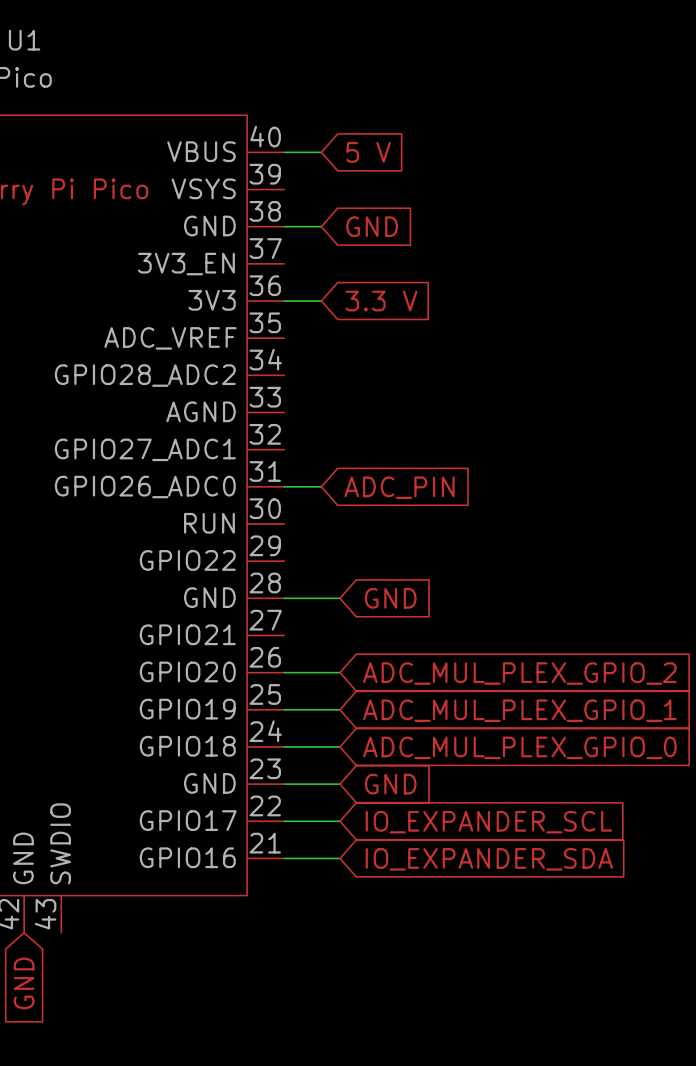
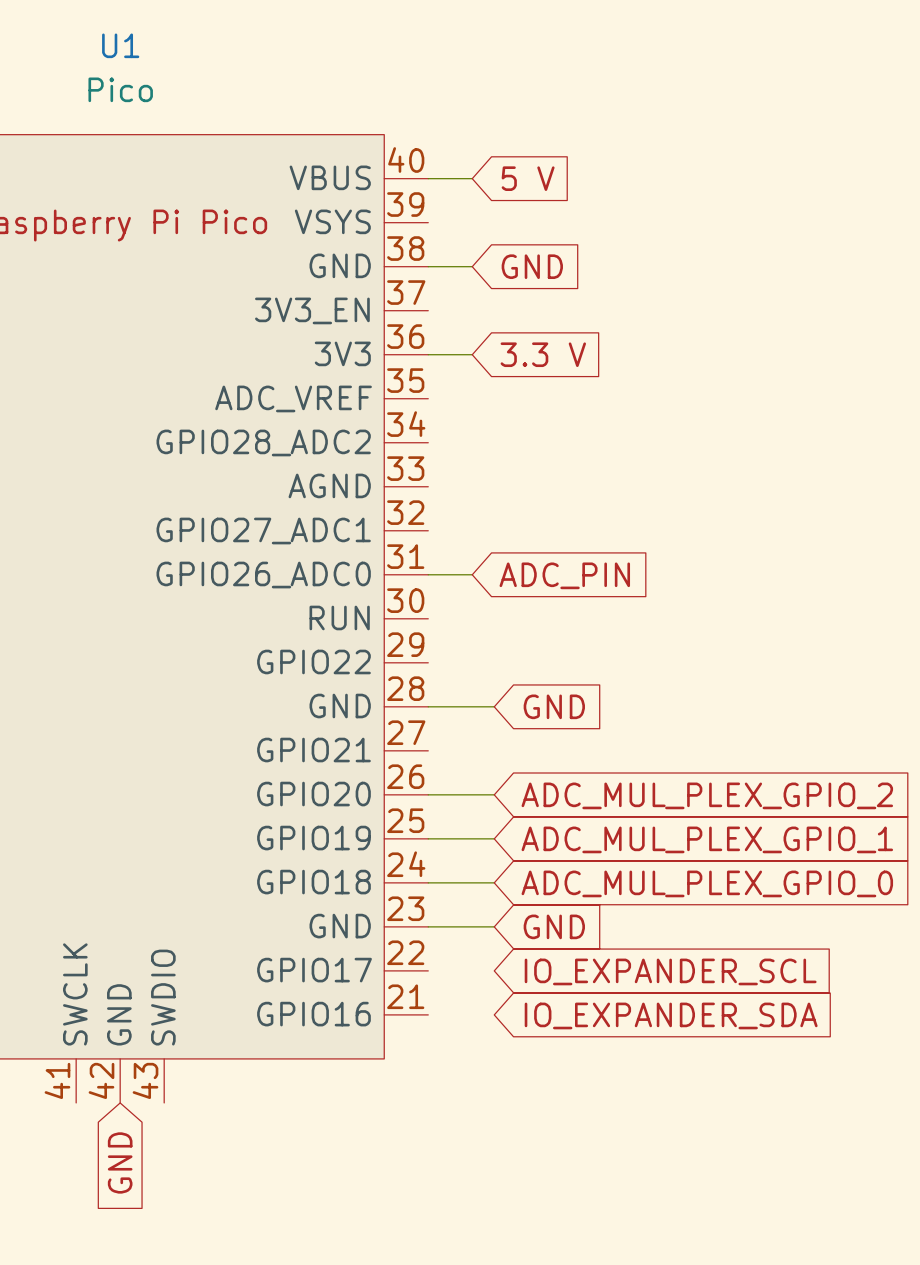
wire: (284, 821) (340, 821) -> none
wire: (284, 858) (340, 858) -> none

